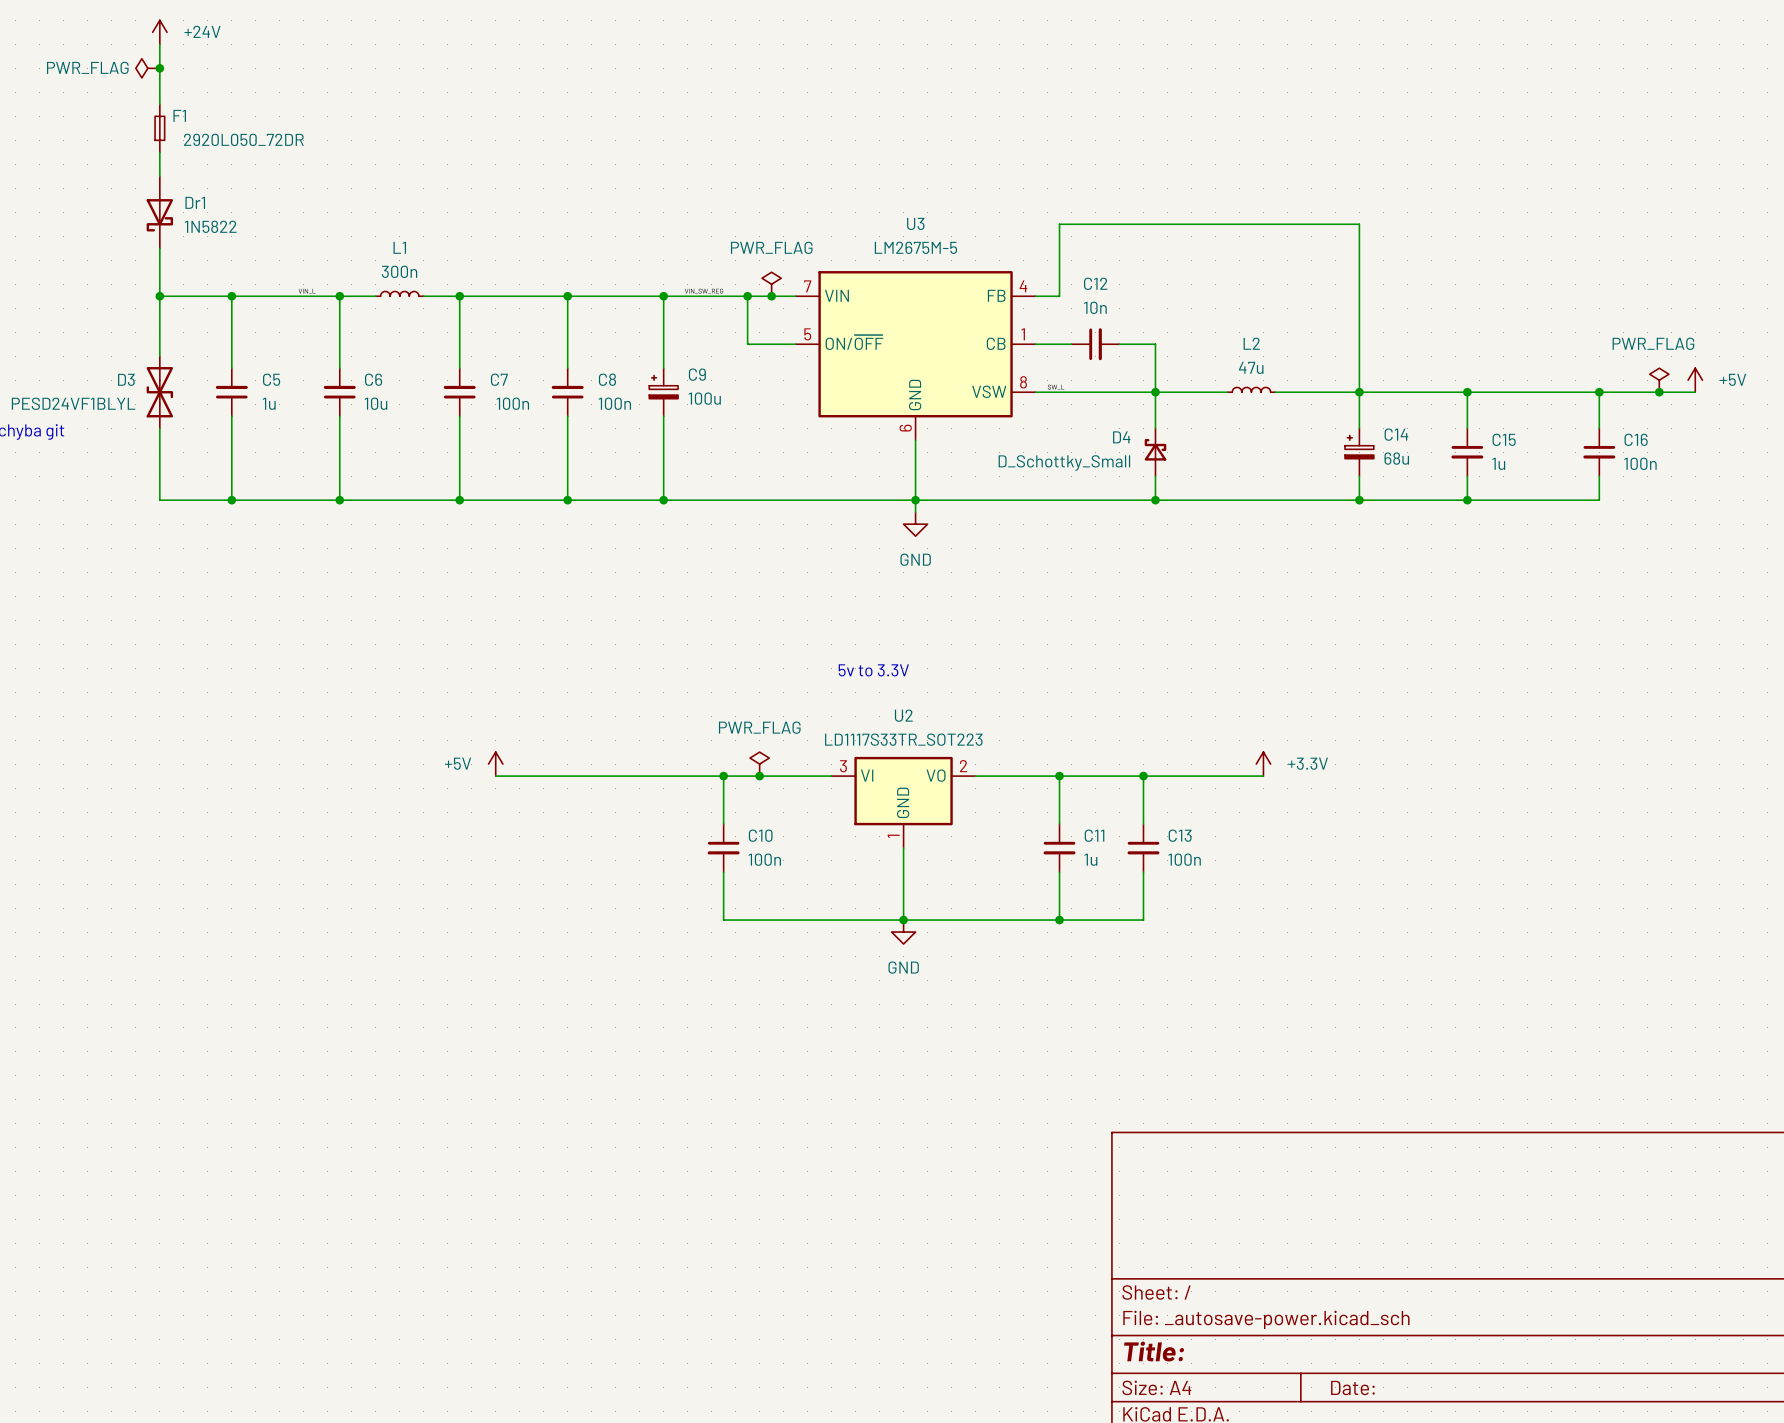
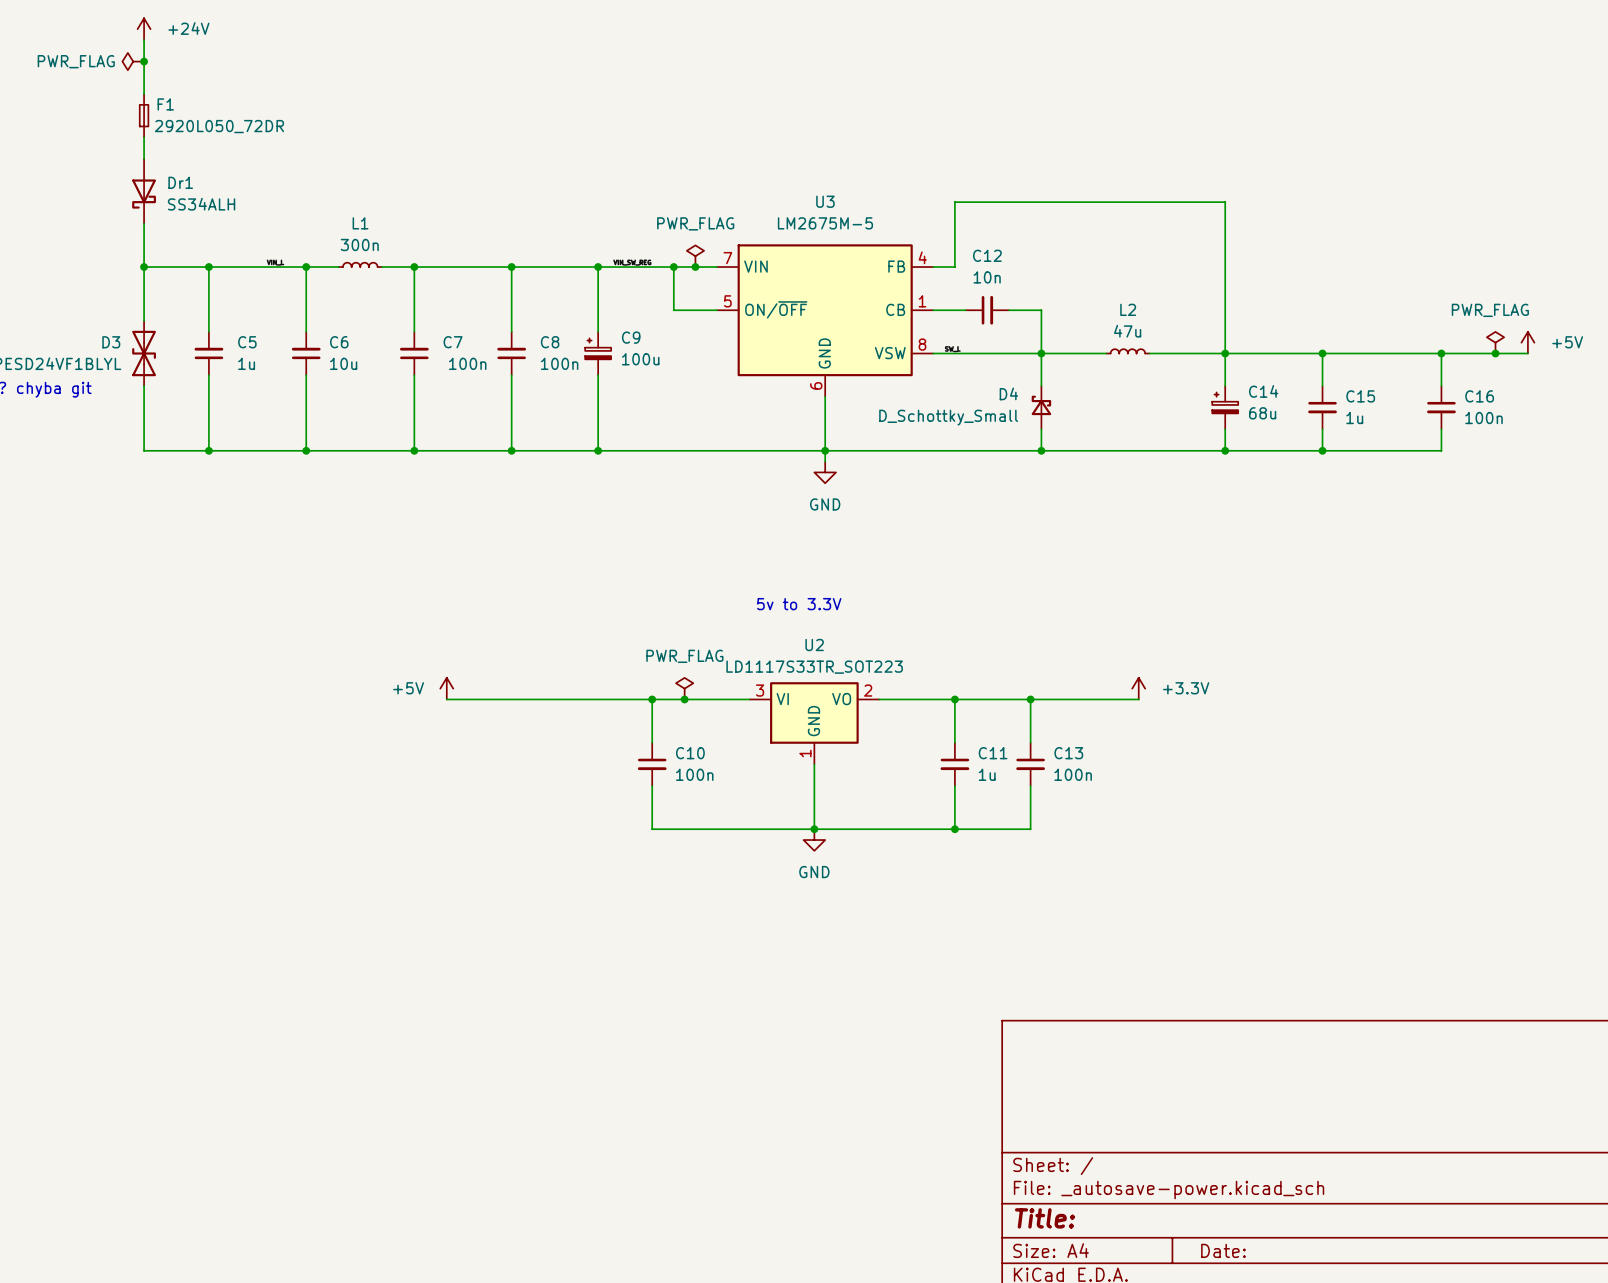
Dr1 value: 1N5822 (210, 226) -> SS34ALH (201, 204)

